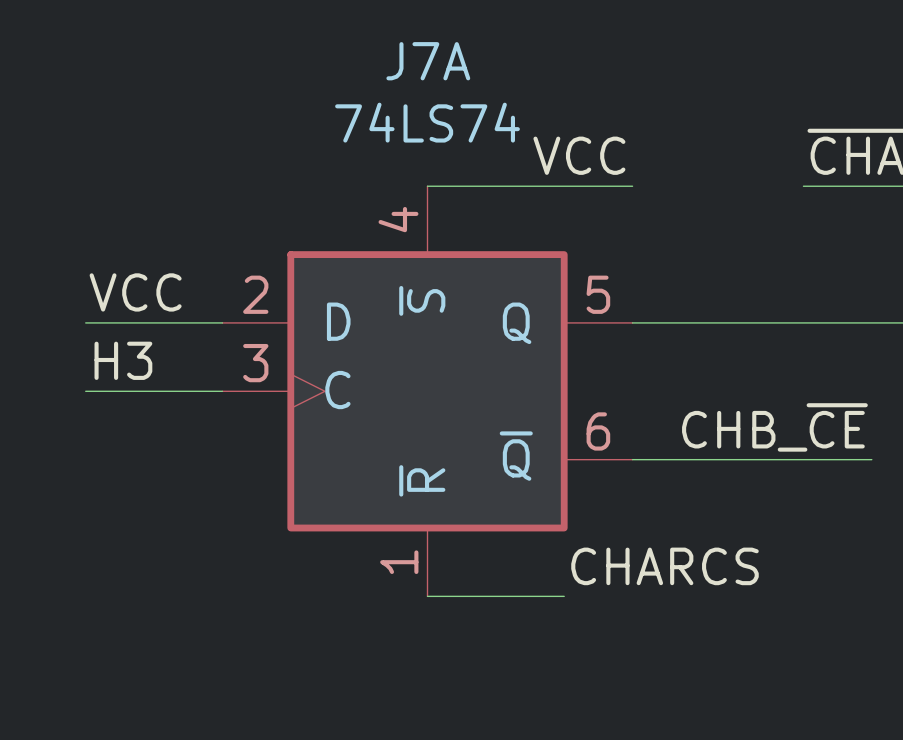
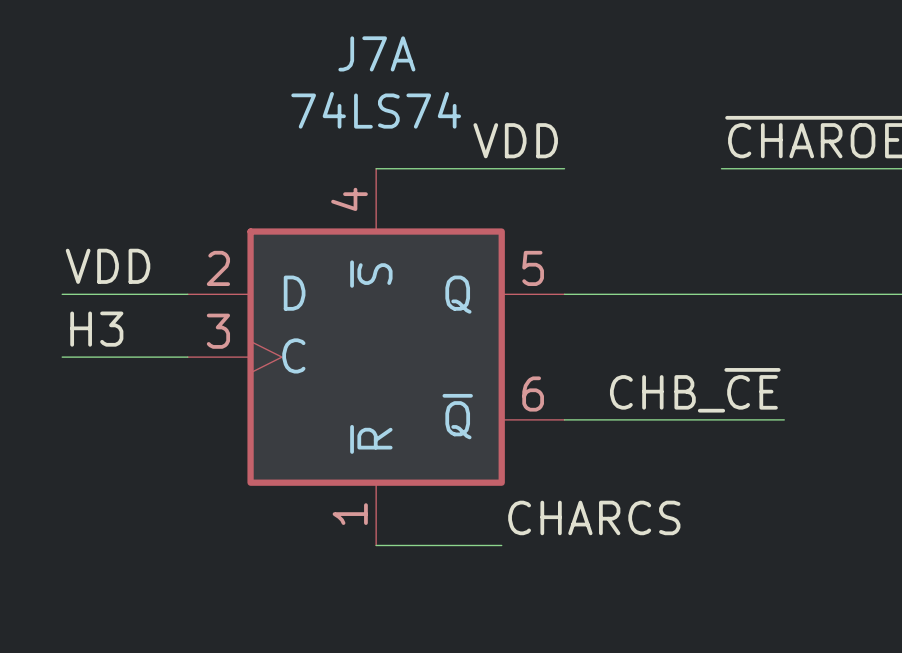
label: VCC (579, 155) -> VDD (515, 140)
label: VCC (135, 292) -> VDD (108, 266)

